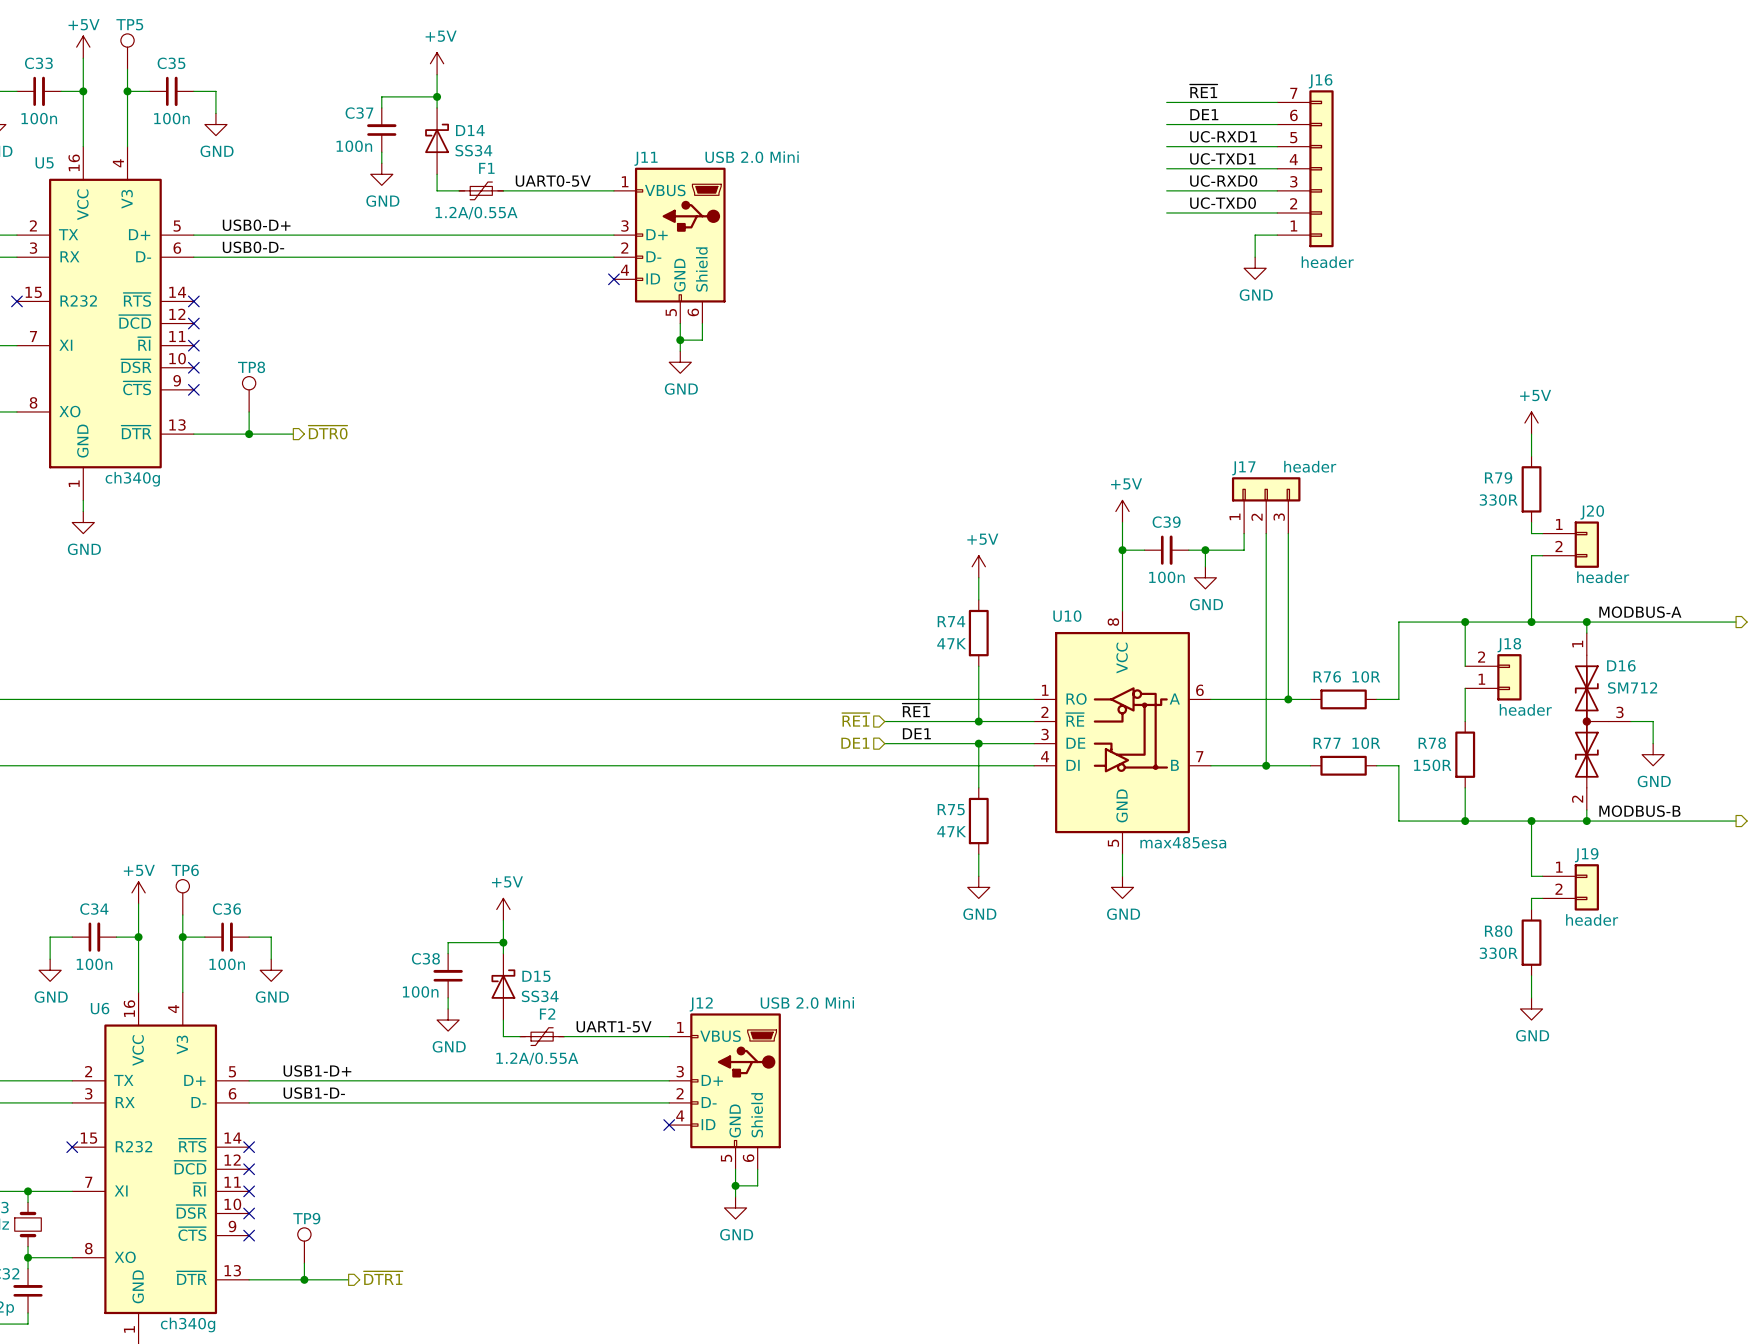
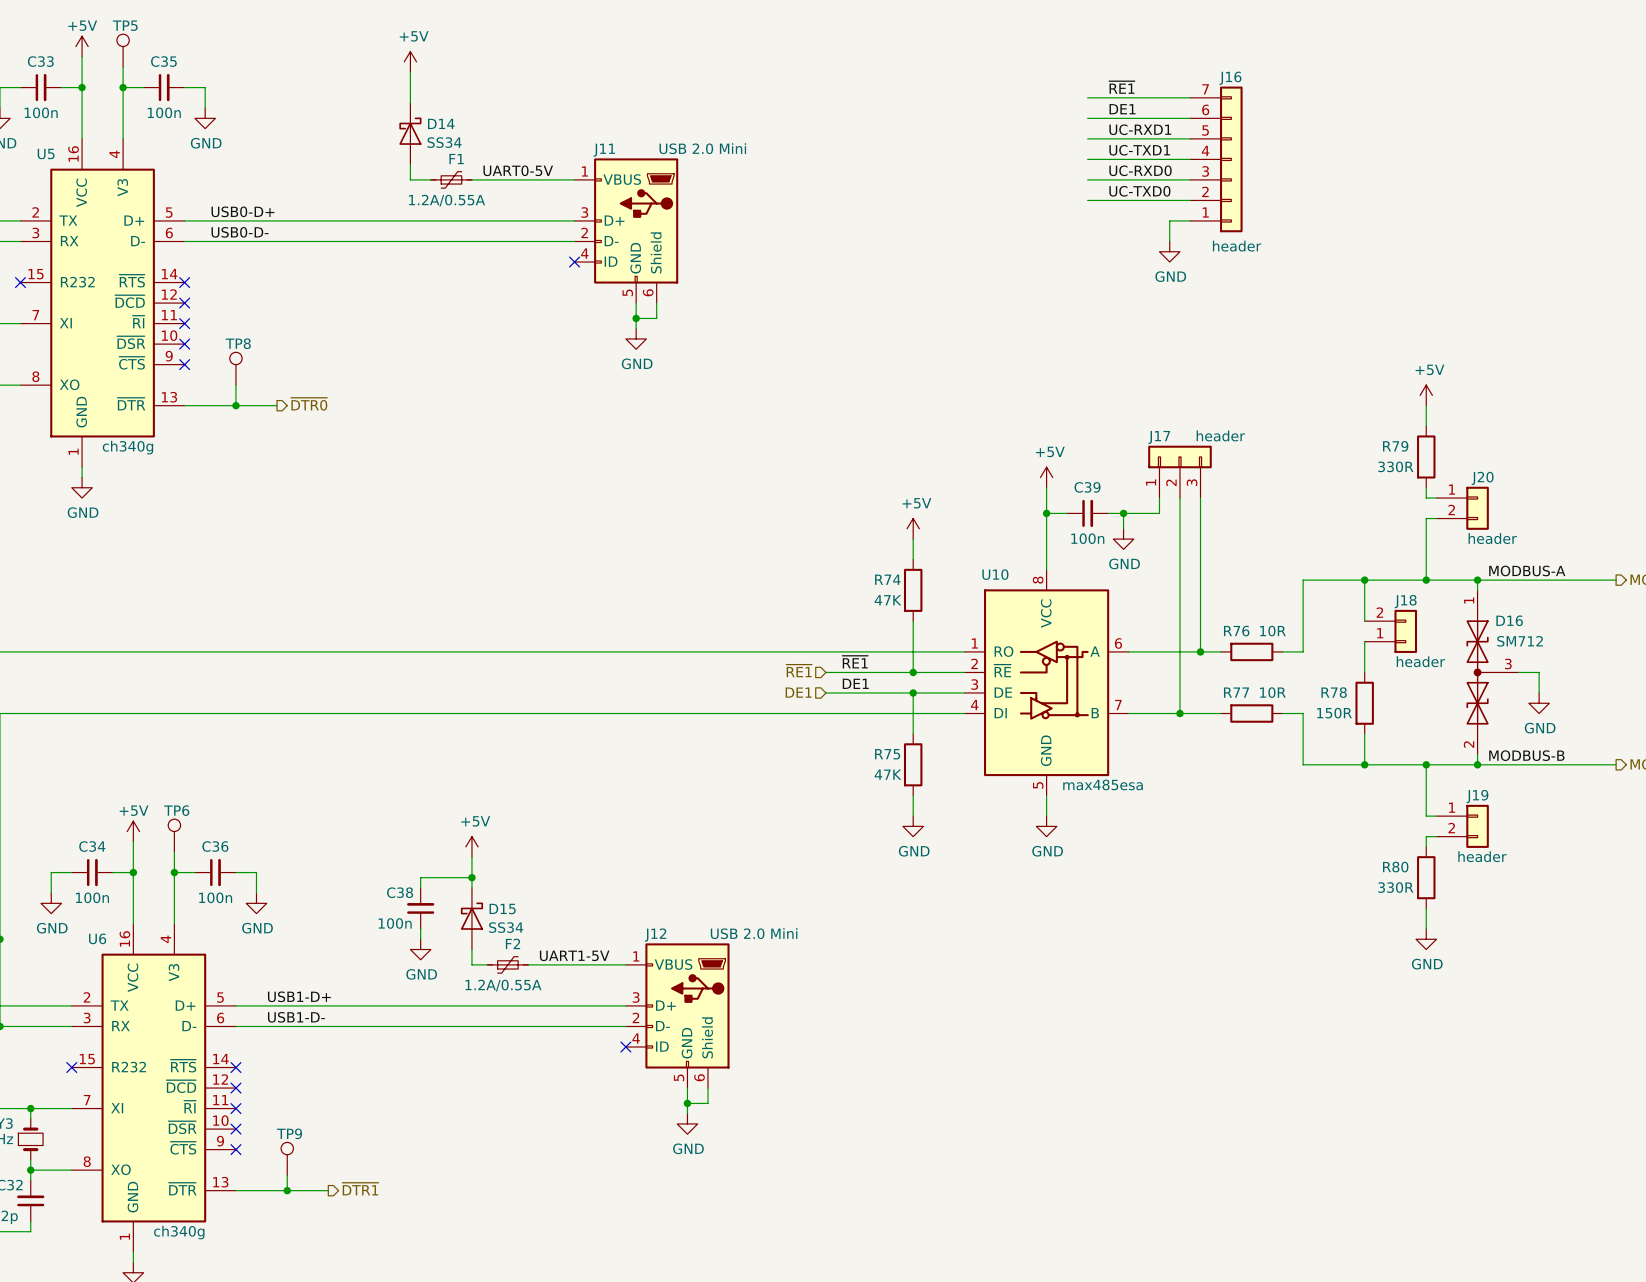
wire: (437, 96) (381, 96) (381, 107) -> none
junction: (437, 96) -> none
C37: 100n (381, 130) -> none
wire: (381, 152) (381, 163) -> none
power symbol: GND (381, 174) -> none

